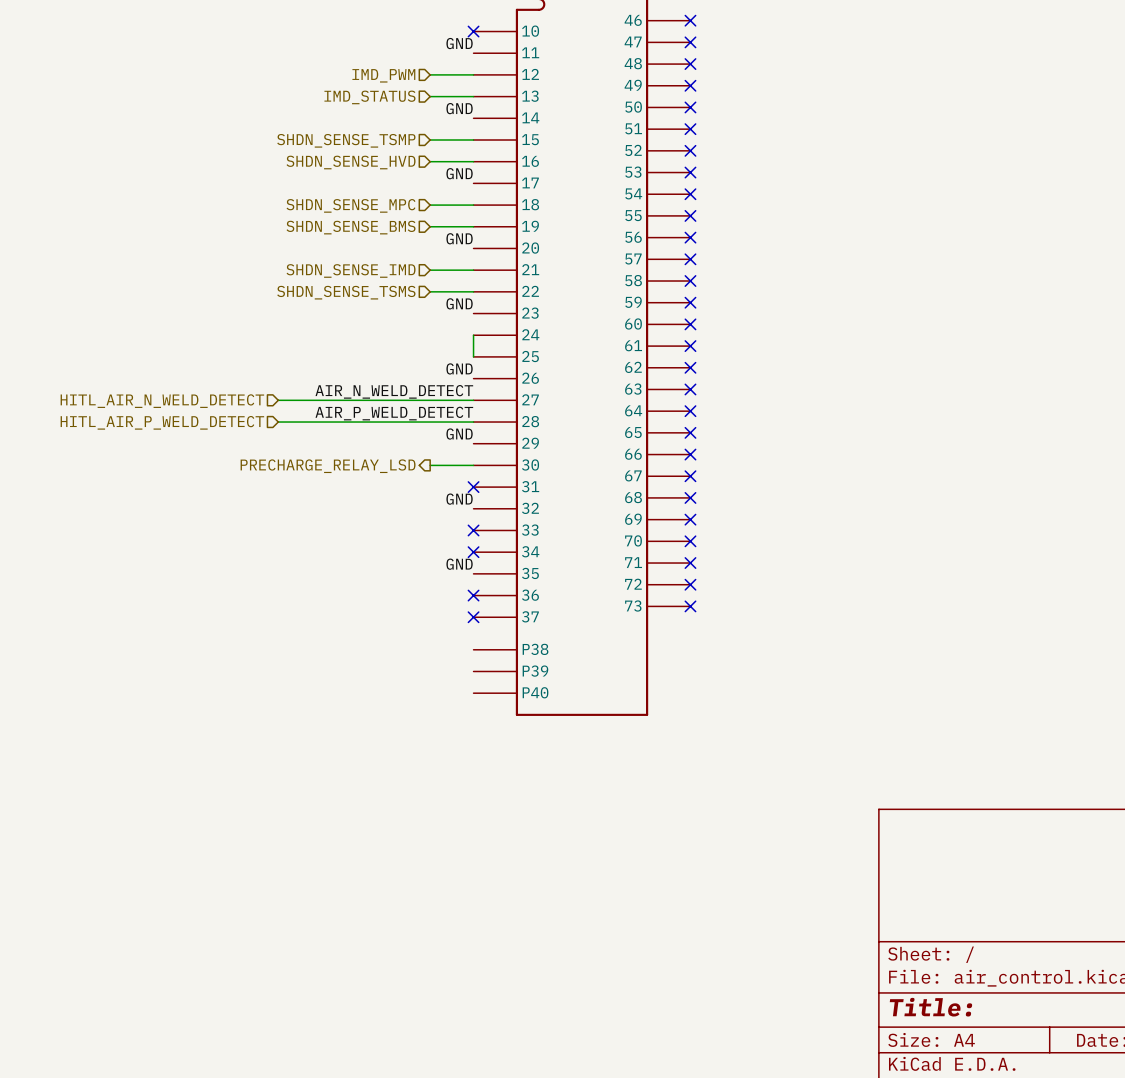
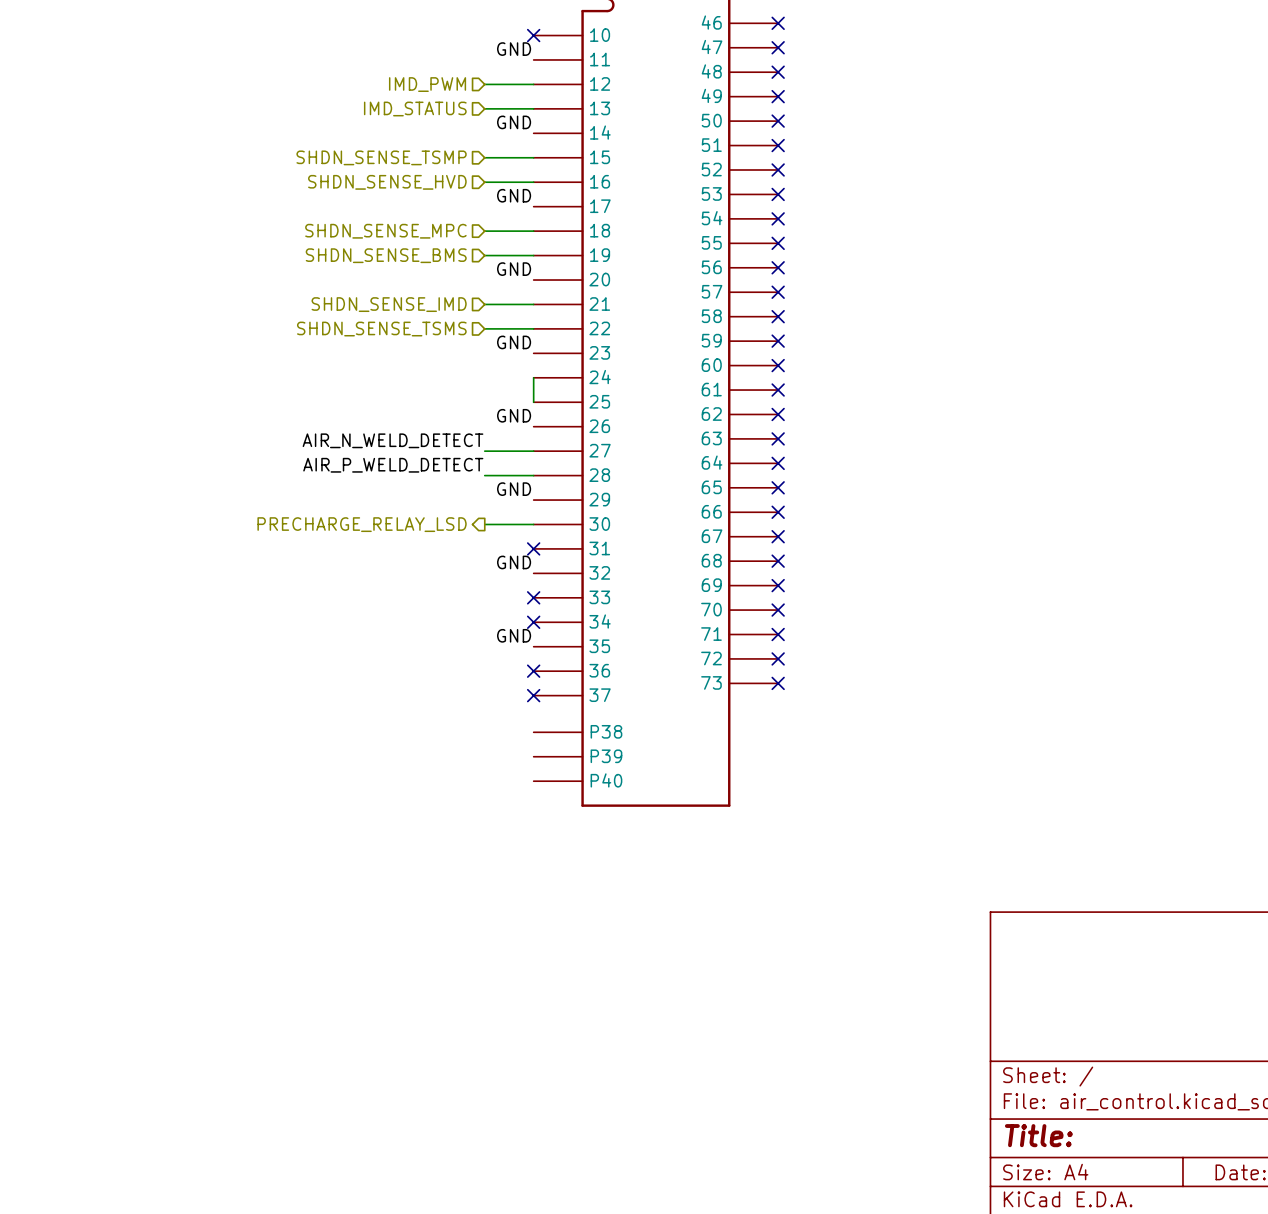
label position: AIR_N_WELD_DETECT (394, 391) -> AIR_N_WELD_DETECT (393, 440)
wire: (278, 400) (430, 400) -> none
hierarchical label: HITL_AIR_N_WELD_DETECT (162, 401) -> none
label position: AIR_P_WELD_DETECT (394, 413) -> AIR_P_WELD_DETECT (393, 465)
hierarchical label: HITL_AIR_P_WELD_DETECT (162, 422) -> none
wire: (278, 422) (430, 422) -> none

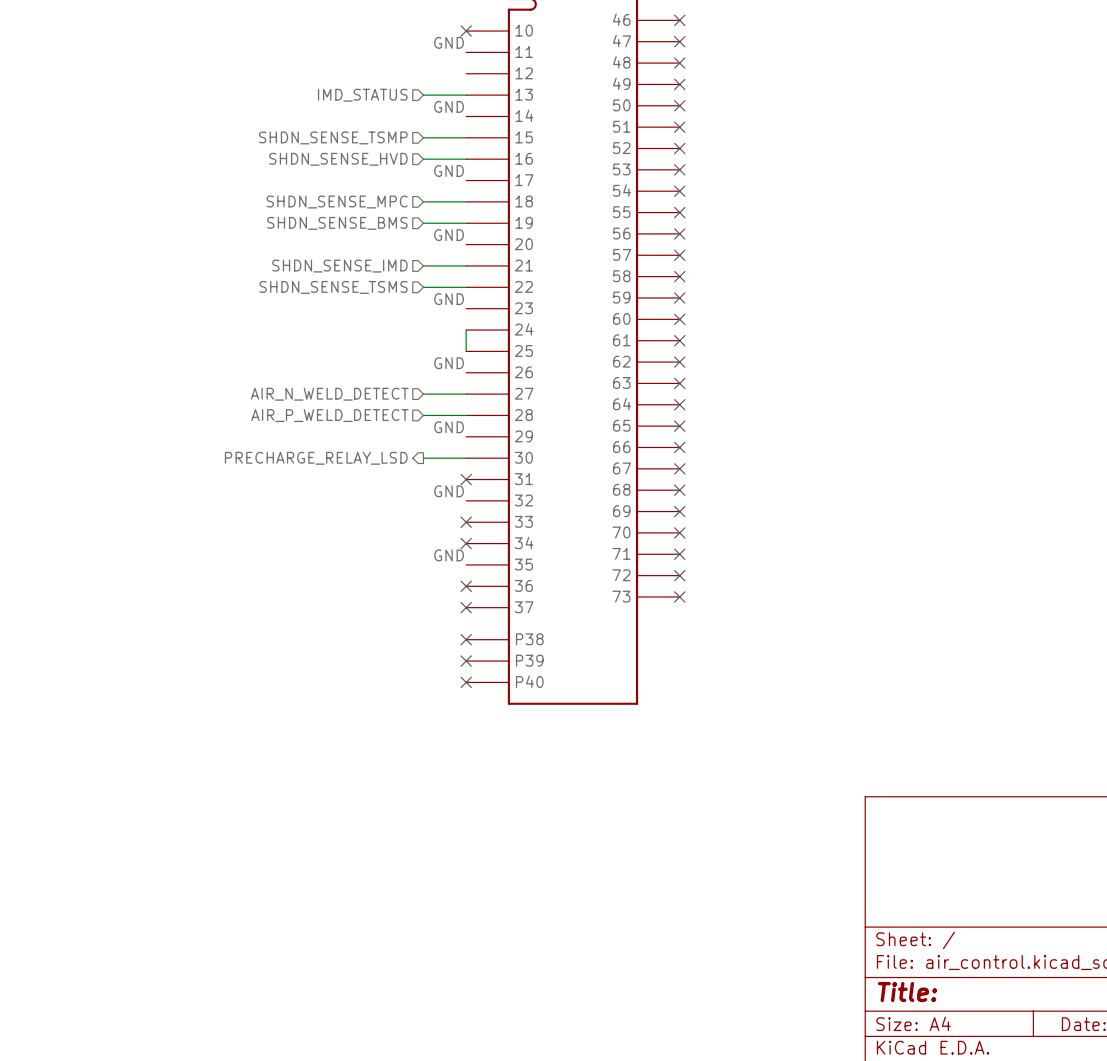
hierarchical label: IMD_PWM (427, 84) -> none
wire: (484, 84) (533, 84) -> none
label: AIR_N_WELD_DETECT (393, 440) -> none
hierarchical label: none -> AIR_N_WELD_DETECT (329, 394)
label: AIR_P_WELD_DETECT (393, 465) -> none
hierarchical label: none -> AIR_P_WELD_DETECT (330, 415)
no-connect mark: none -> (466, 639)
no-connect mark: none -> (466, 661)
no-connect mark: none -> (466, 682)

